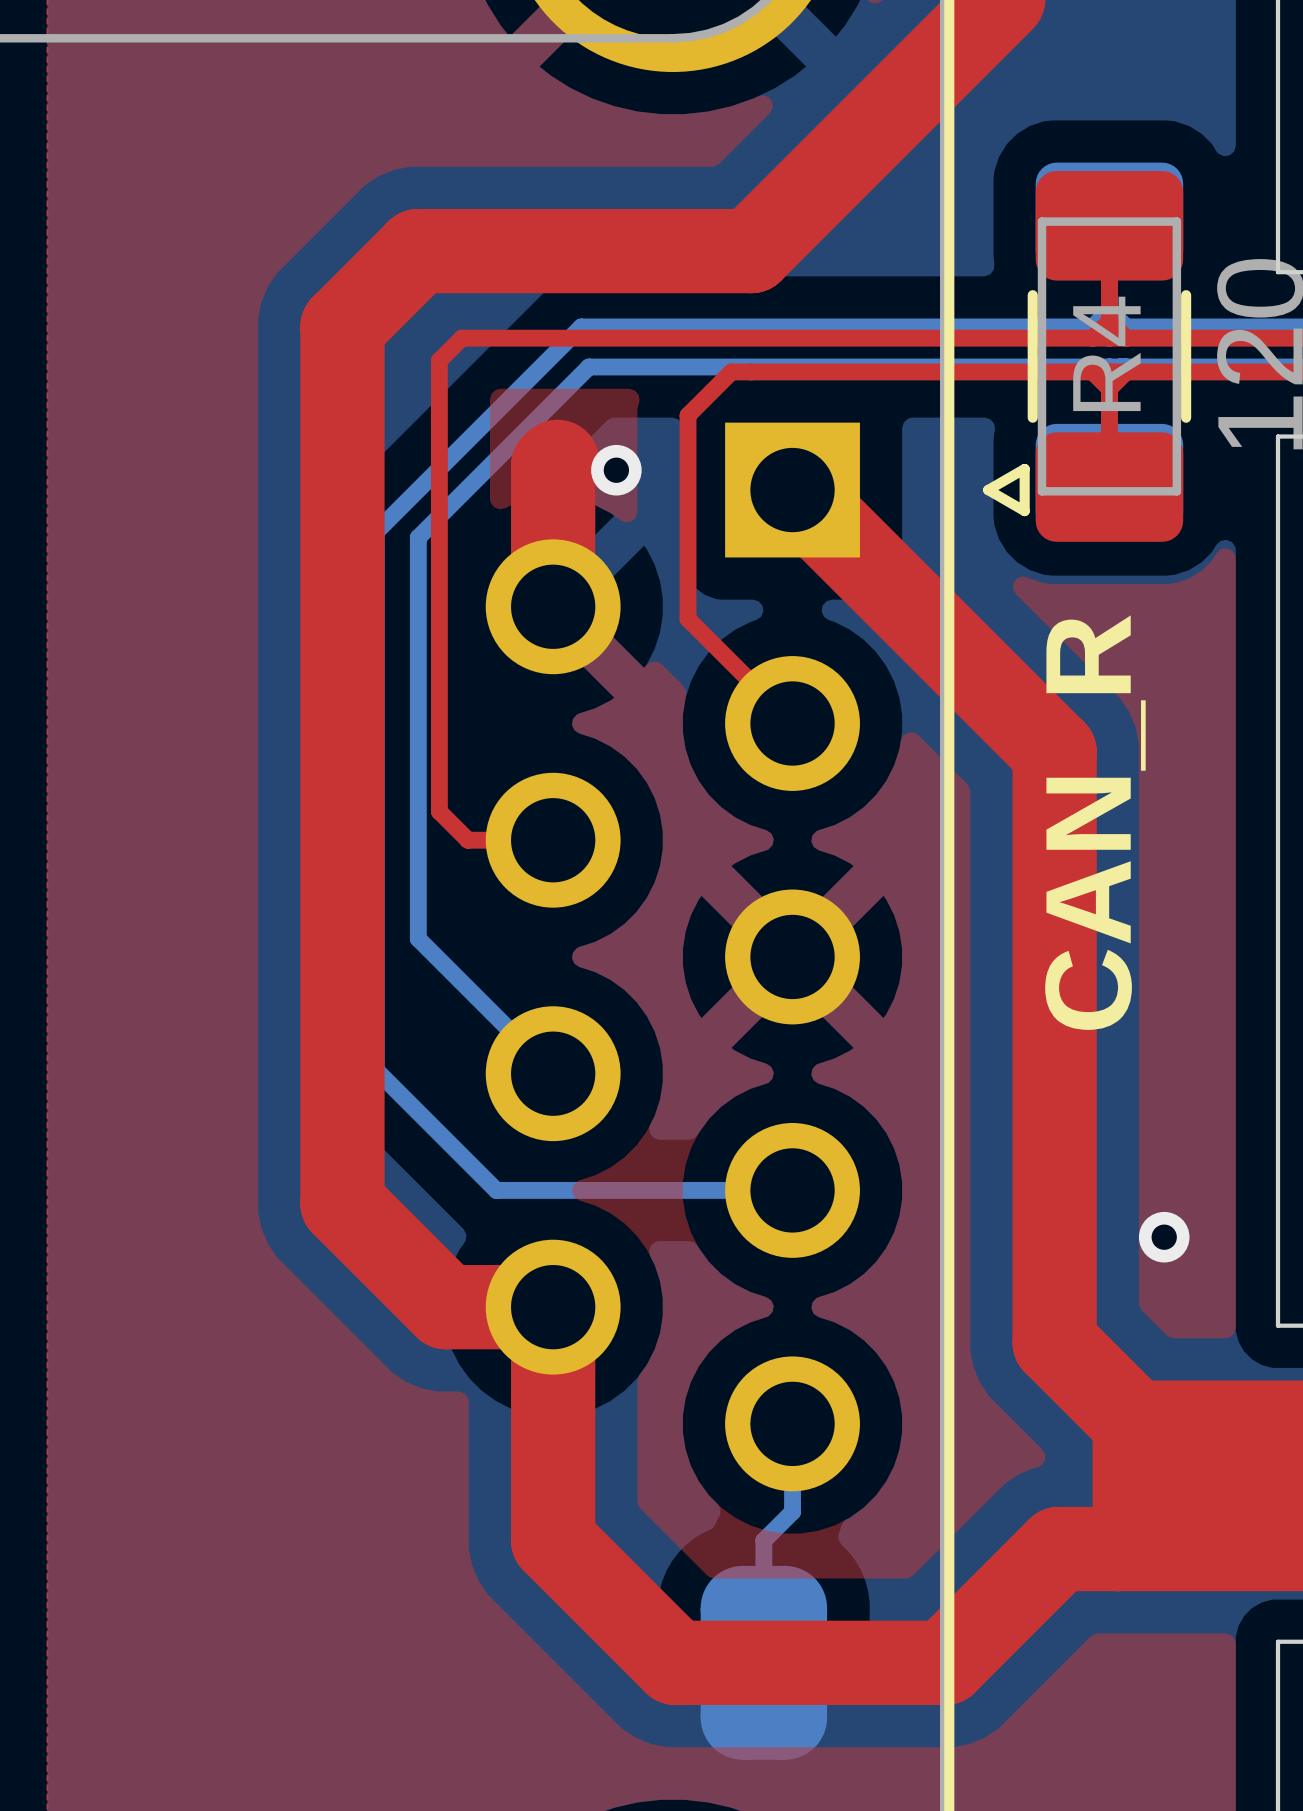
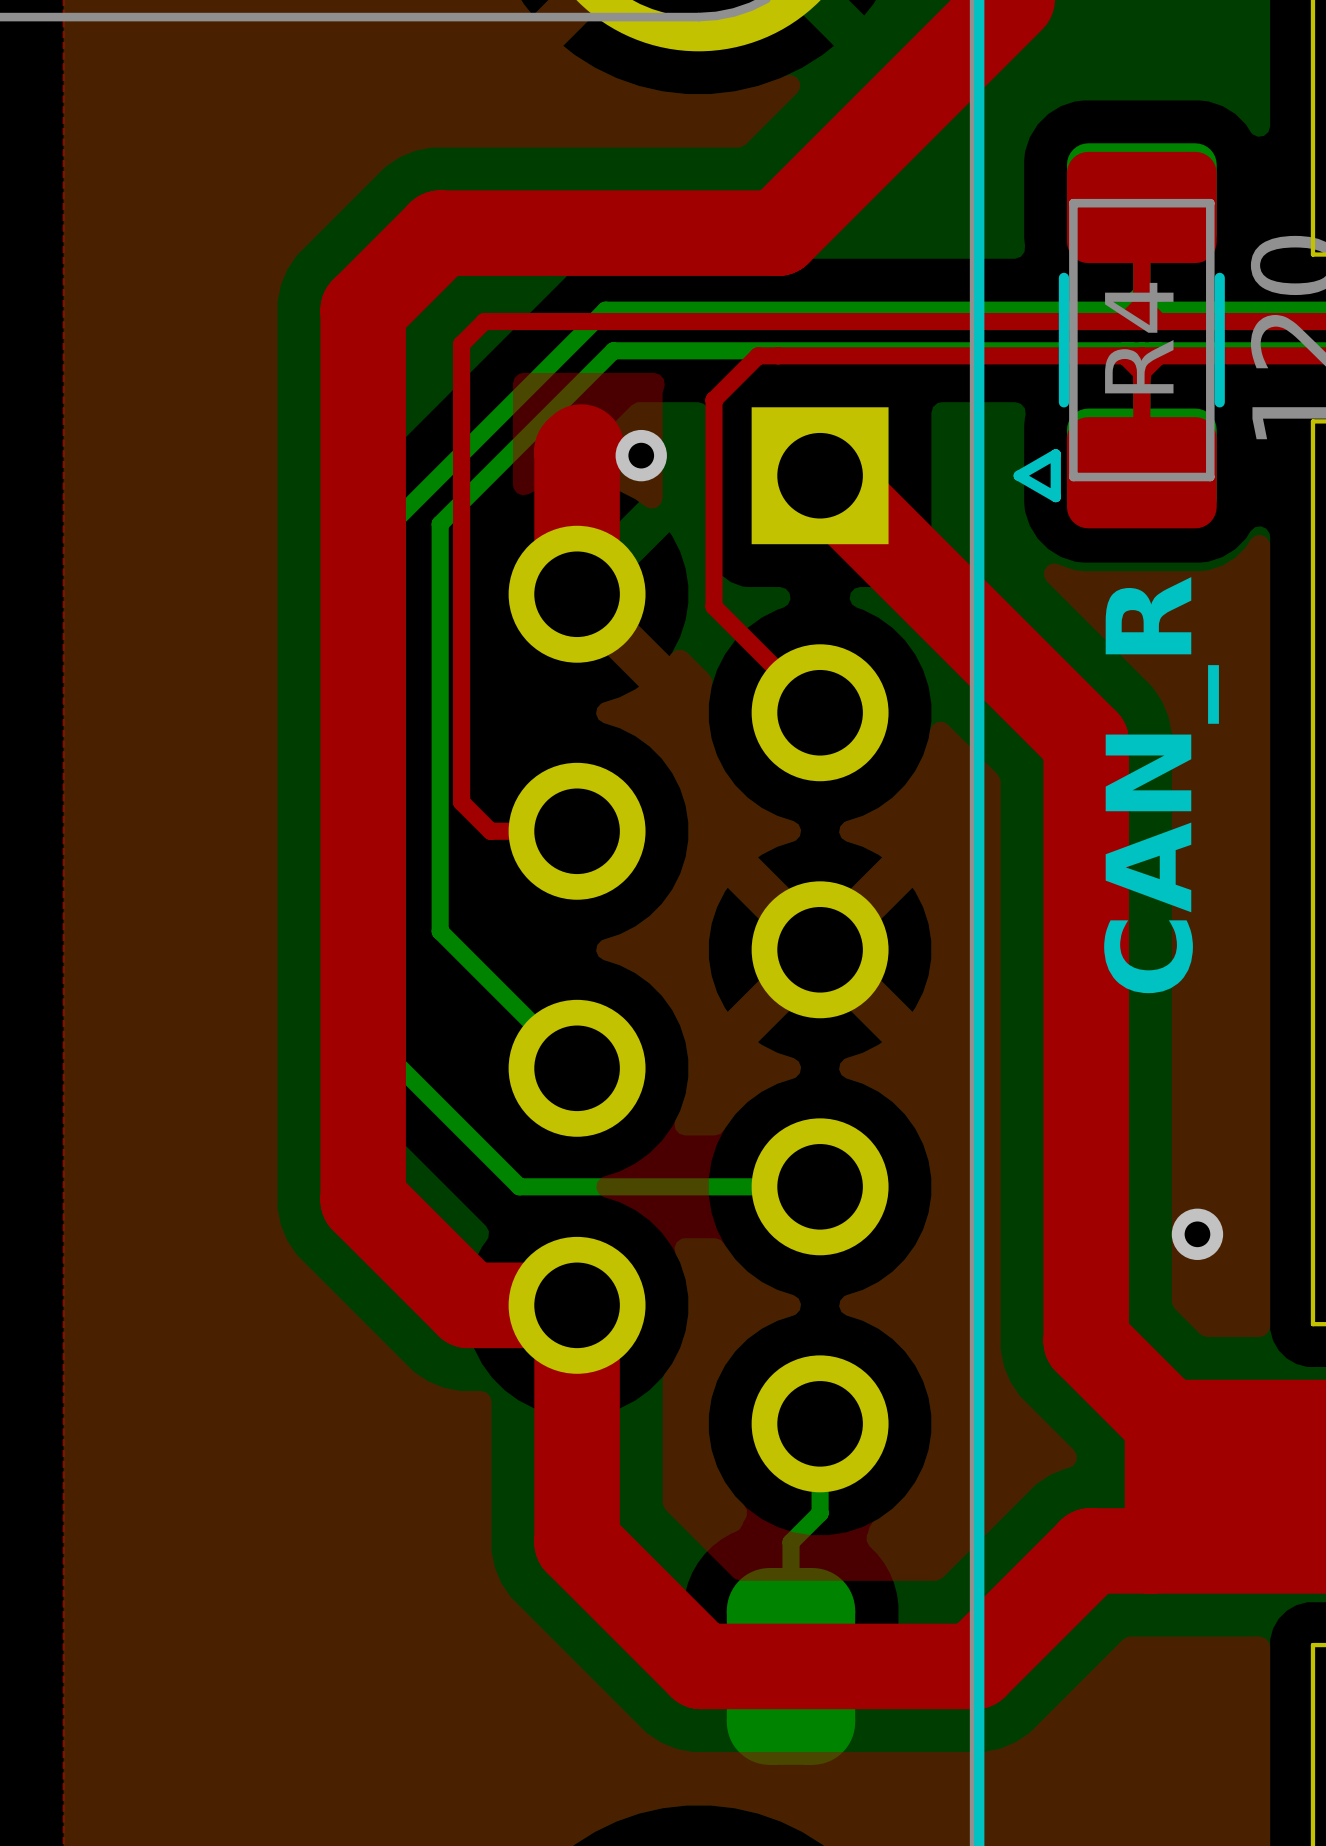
text position: CAN_R (1095, 822) -> CAN_R (1161, 785)

